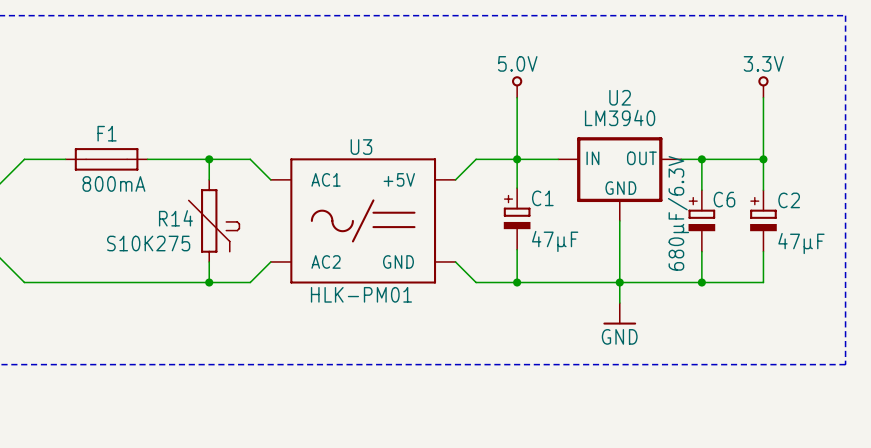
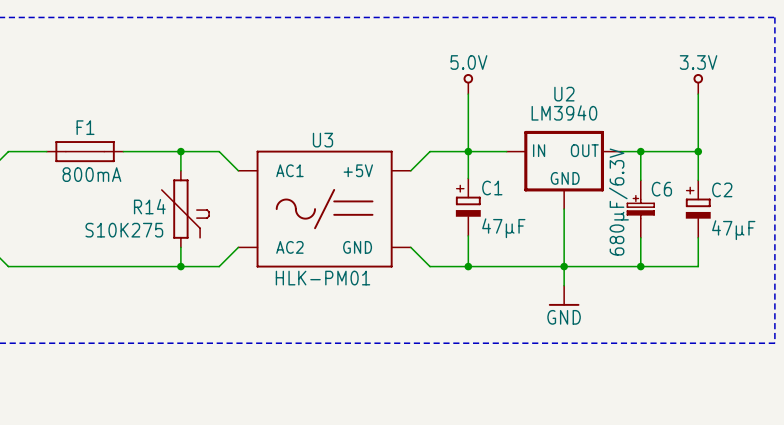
C6 symbol: [688, 190, 716, 252] -> [626, 180, 655, 238]

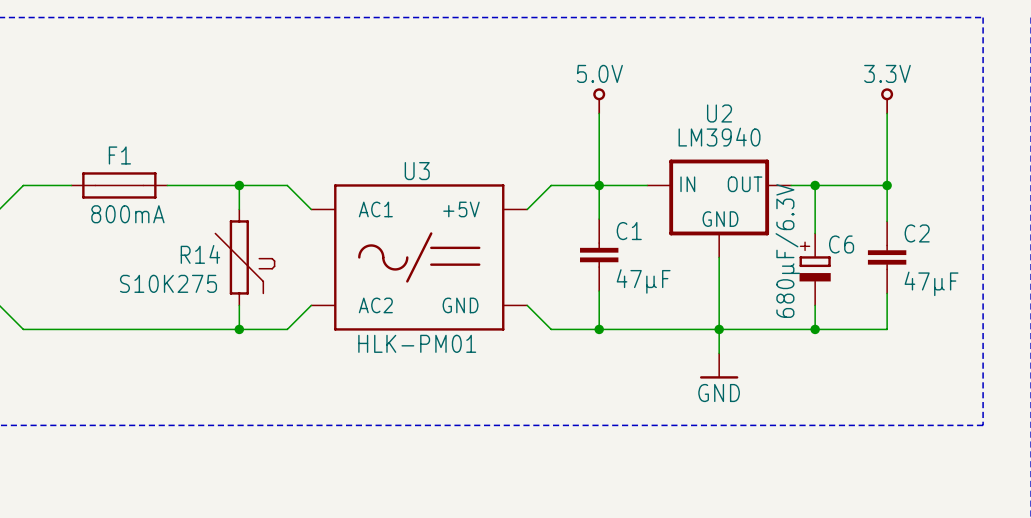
C1 symbol: [455, 178, 481, 236] -> [580, 219, 619, 292]
C6 symbol: [626, 180, 655, 238] -> [799, 233, 831, 306]
C2 symbol: [685, 180, 711, 238] -> [867, 221, 907, 294]

